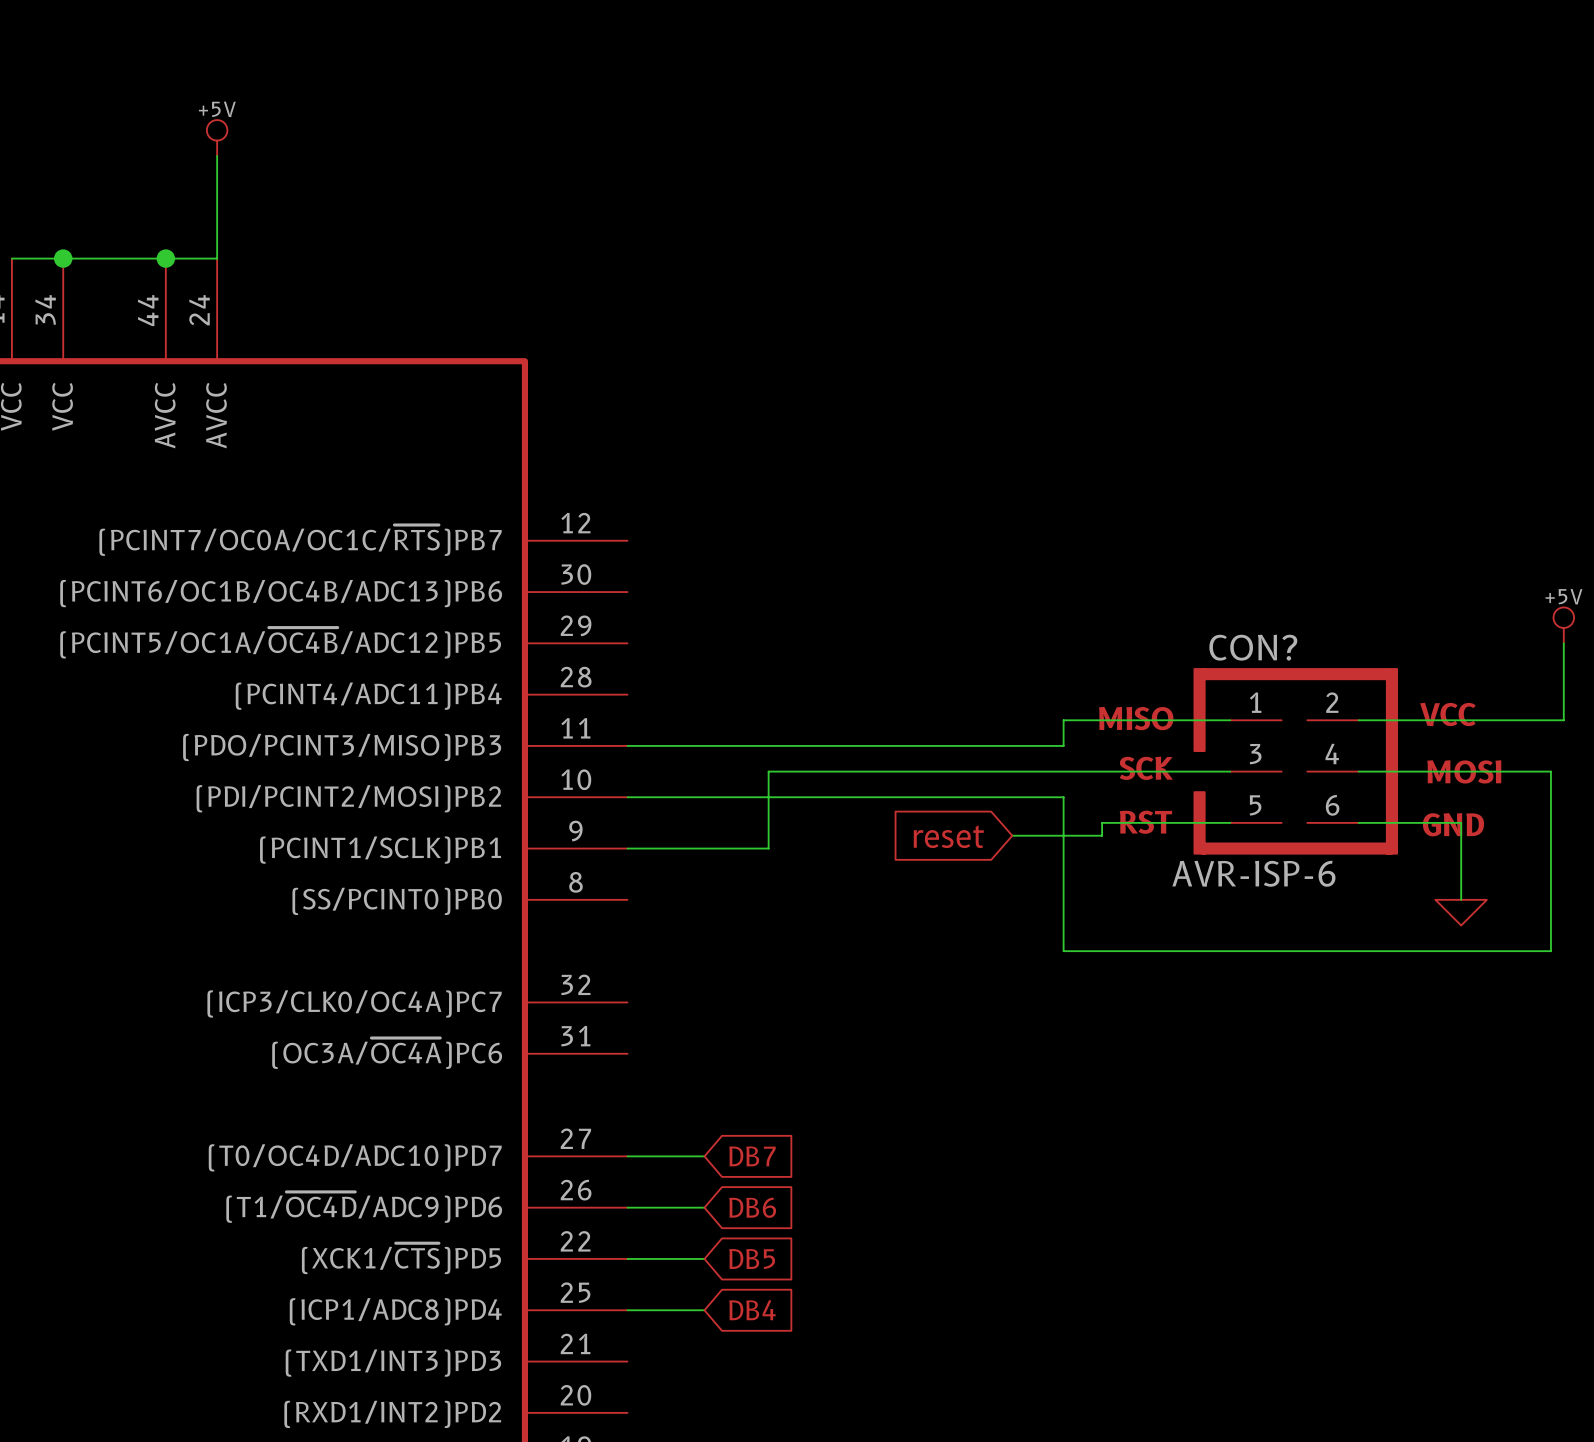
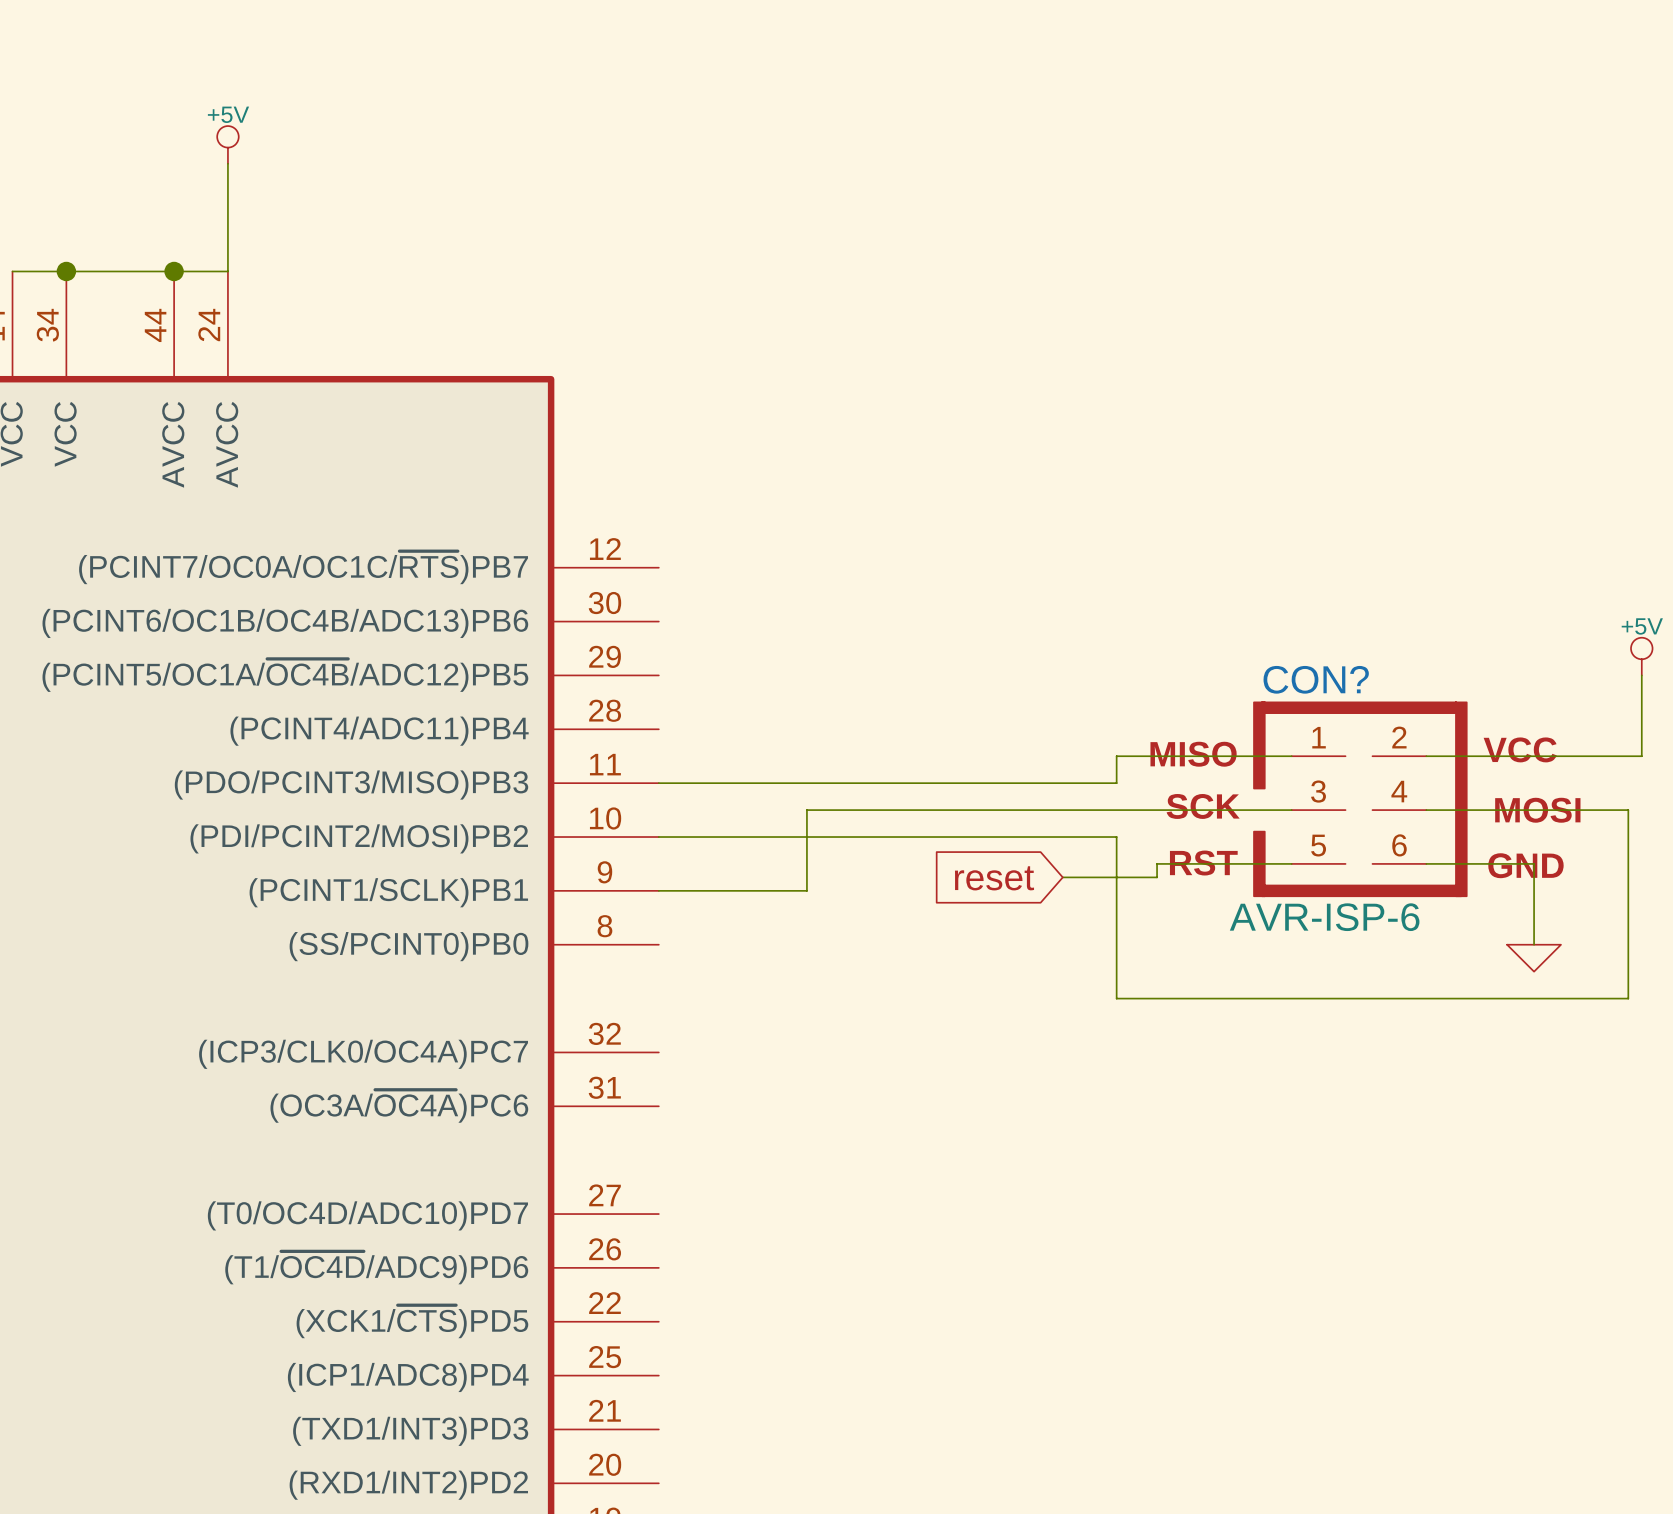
wire: (627, 1156) (704, 1156) -> none
global label: DB7 (752, 1156) -> none
wire: (627, 1207) (704, 1207) -> none
global label: DB6 (752, 1207) -> none
wire: (627, 1258) (704, 1258) -> none
global label: DB5 (752, 1259) -> none
wire: (627, 1310) (704, 1310) -> none
global label: DB4 (752, 1310) -> none

